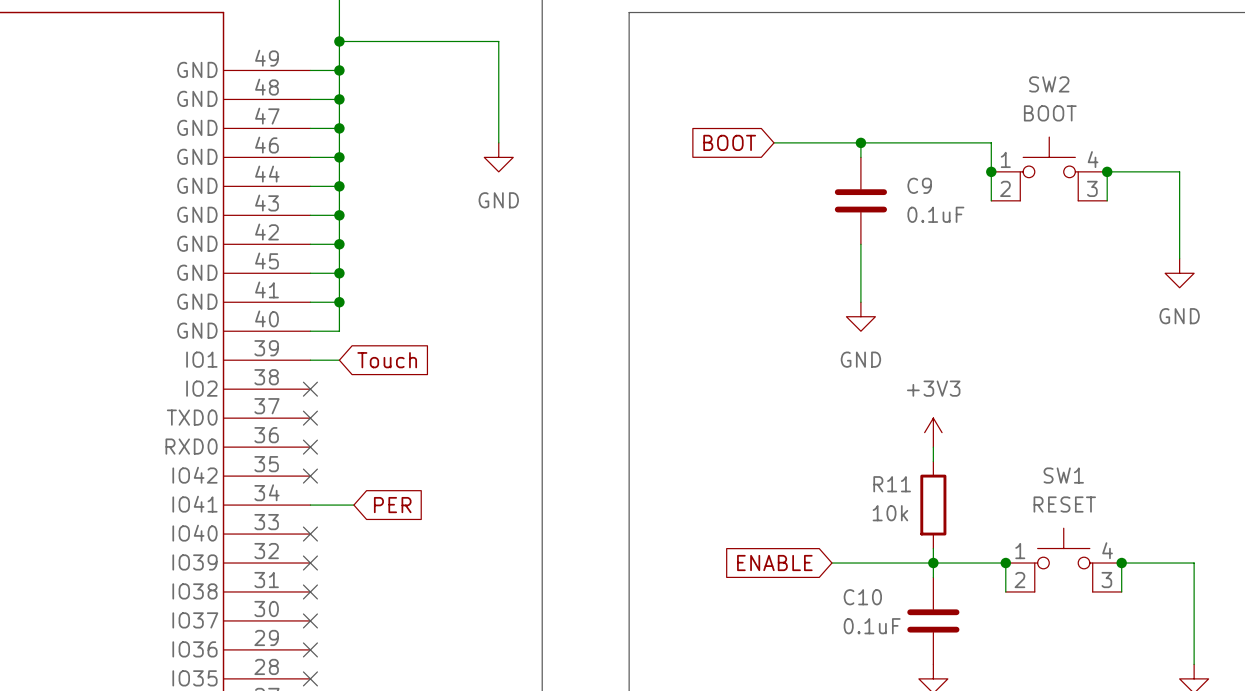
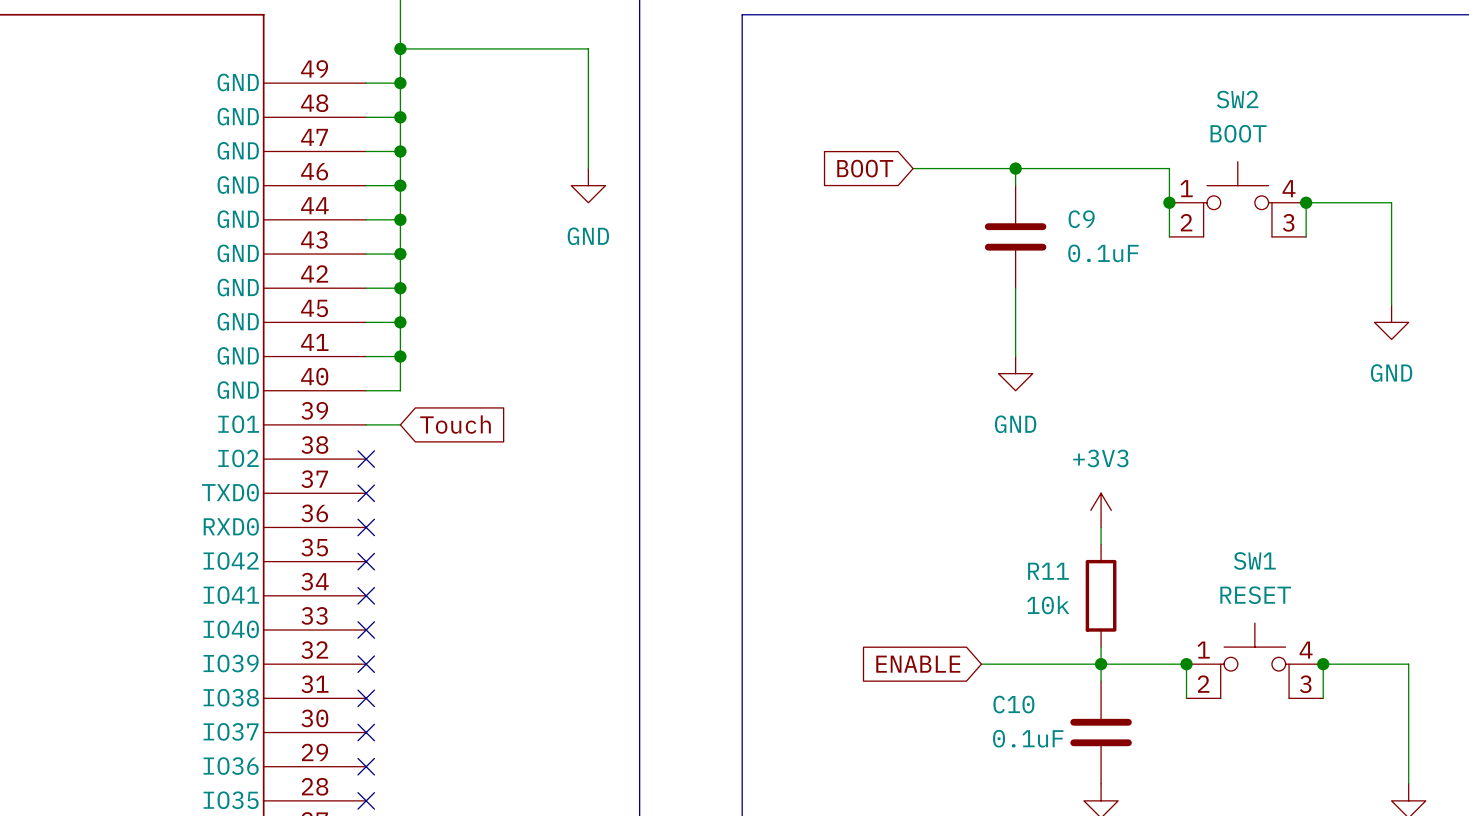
wire: (310, 505) (353, 505) -> none
no-connect mark: none -> (366, 595)
global label: PER (392, 505) -> none

